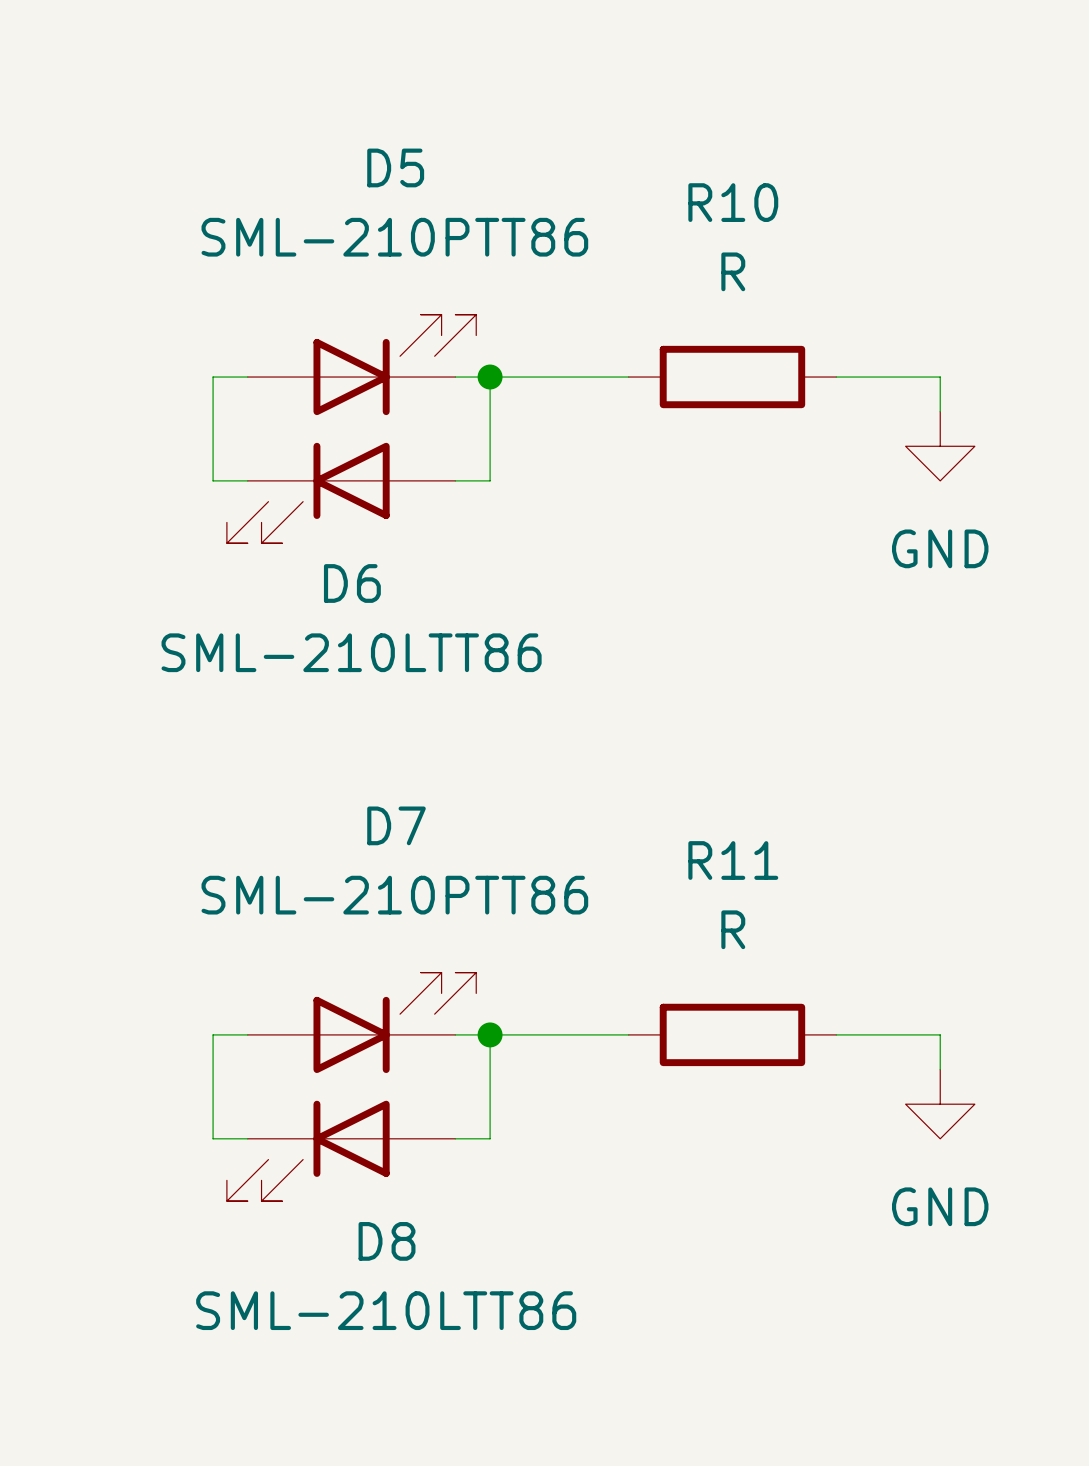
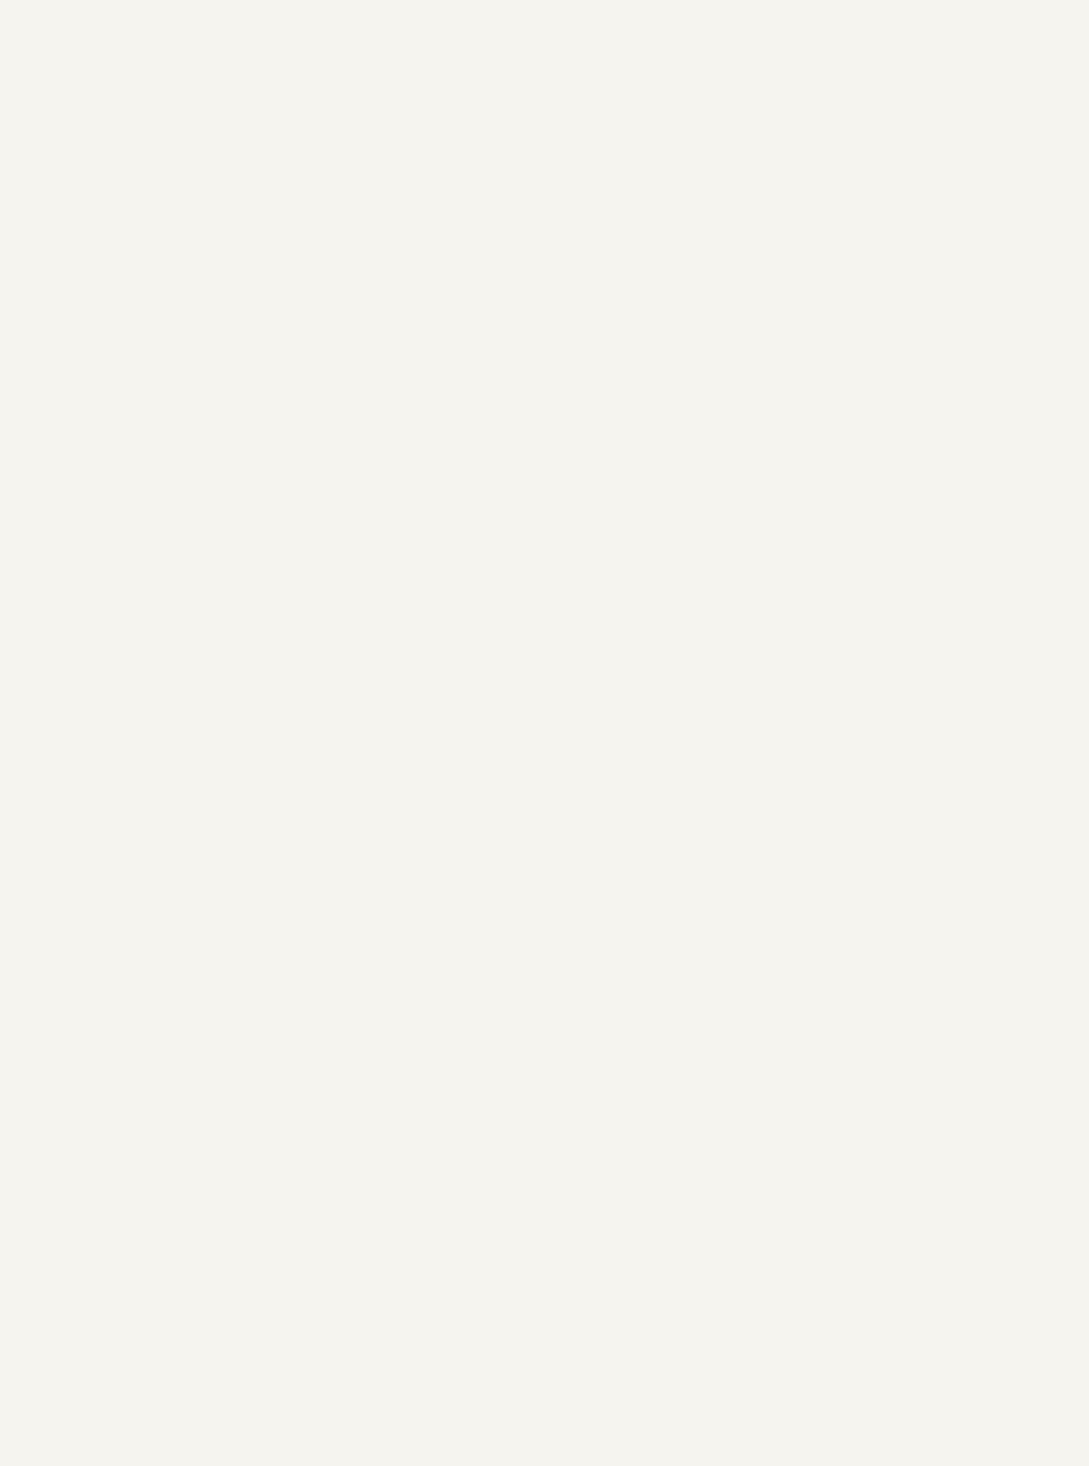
D5: SML-210PTT86 (361, 364) -> none
wire: (247, 377) (213, 377) (213, 480) (247, 480) -> none
wire: (455, 377) (628, 377) -> none
wire: (490, 377) (490, 480) (455, 480) -> none
junction: (490, 377) -> none
R10: R (732, 377) -> none
wire: (836, 377) (940, 377) (940, 411) -> none
power symbol: GND (940, 446) -> none
D6: SML-210LTT86 (341, 493) -> none
D7: SML-210PTT86 (361, 1022) -> none
wire: (247, 1034) (213, 1034) (213, 1138) (247, 1138) -> none
wire: (455, 1034) (628, 1034) -> none
wire: (490, 1034) (490, 1138) (455, 1138) -> none
junction: (490, 1034) -> none
R11: R (732, 1034) -> none
wire: (836, 1034) (940, 1034) (940, 1069) -> none
power symbol: GND (940, 1104) -> none
D8: SML-210LTT86 (341, 1150) -> none

